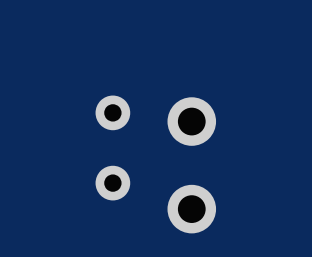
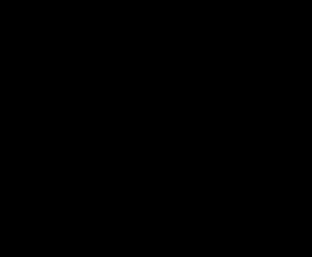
part: (112, 112) -> none
part: (191, 121) -> none
part: (112, 183) -> none
part: (191, 209) -> none

